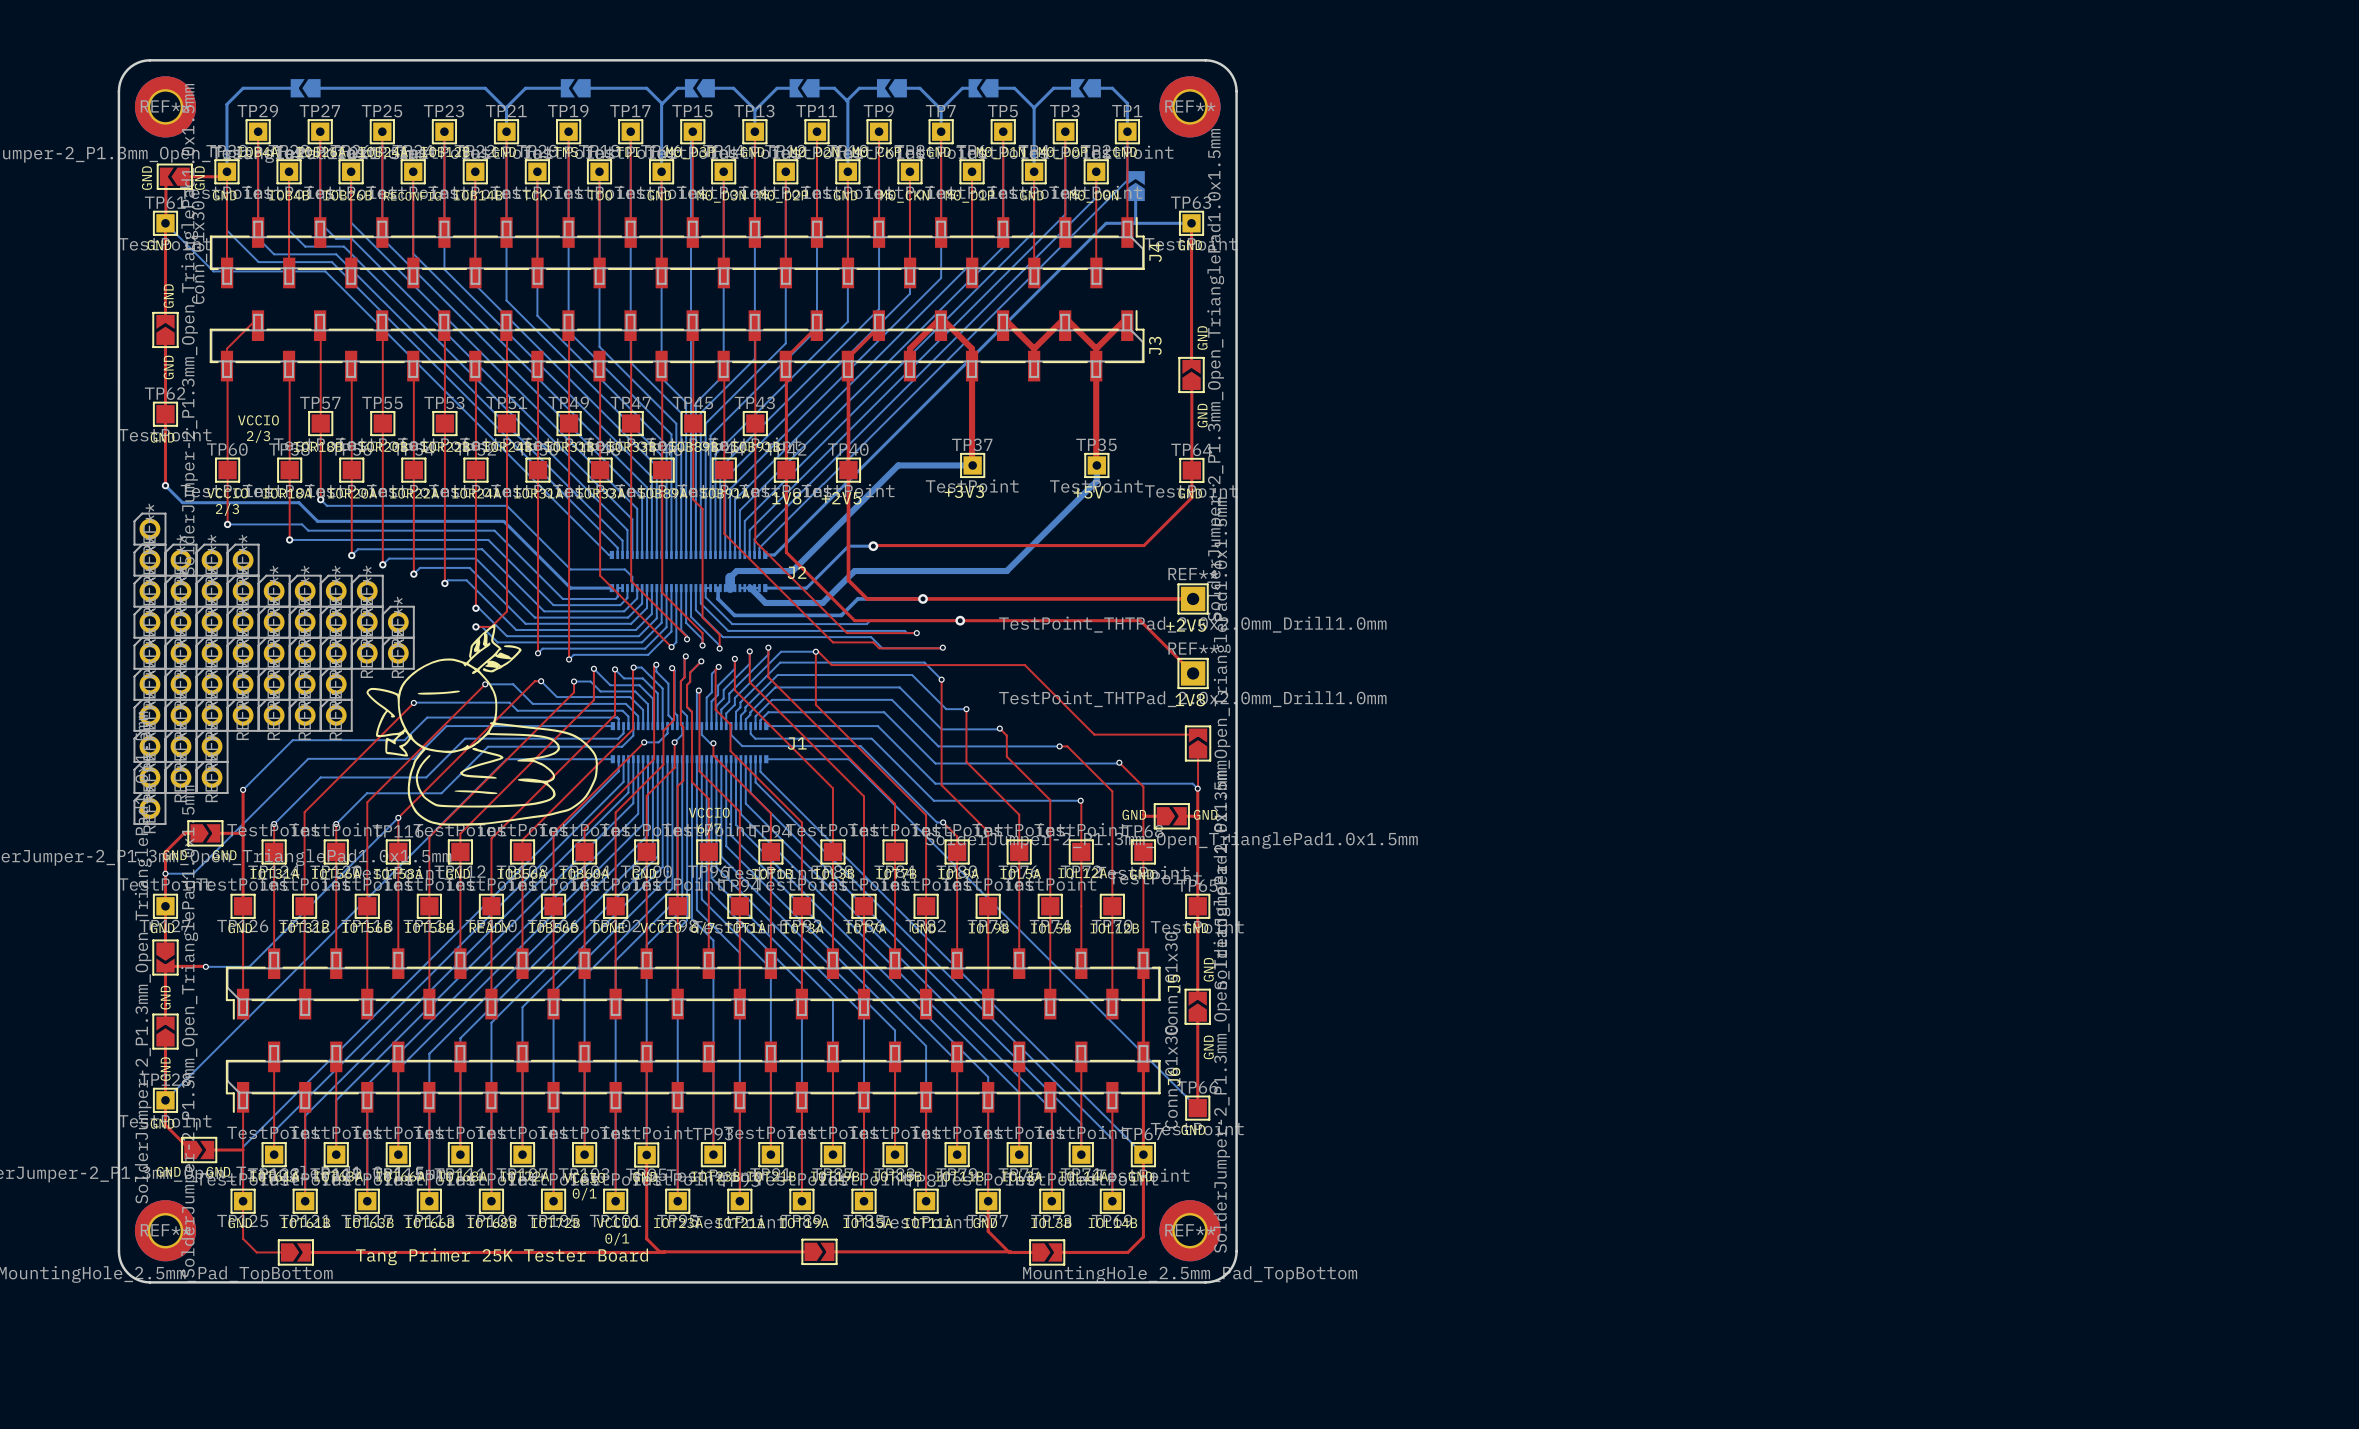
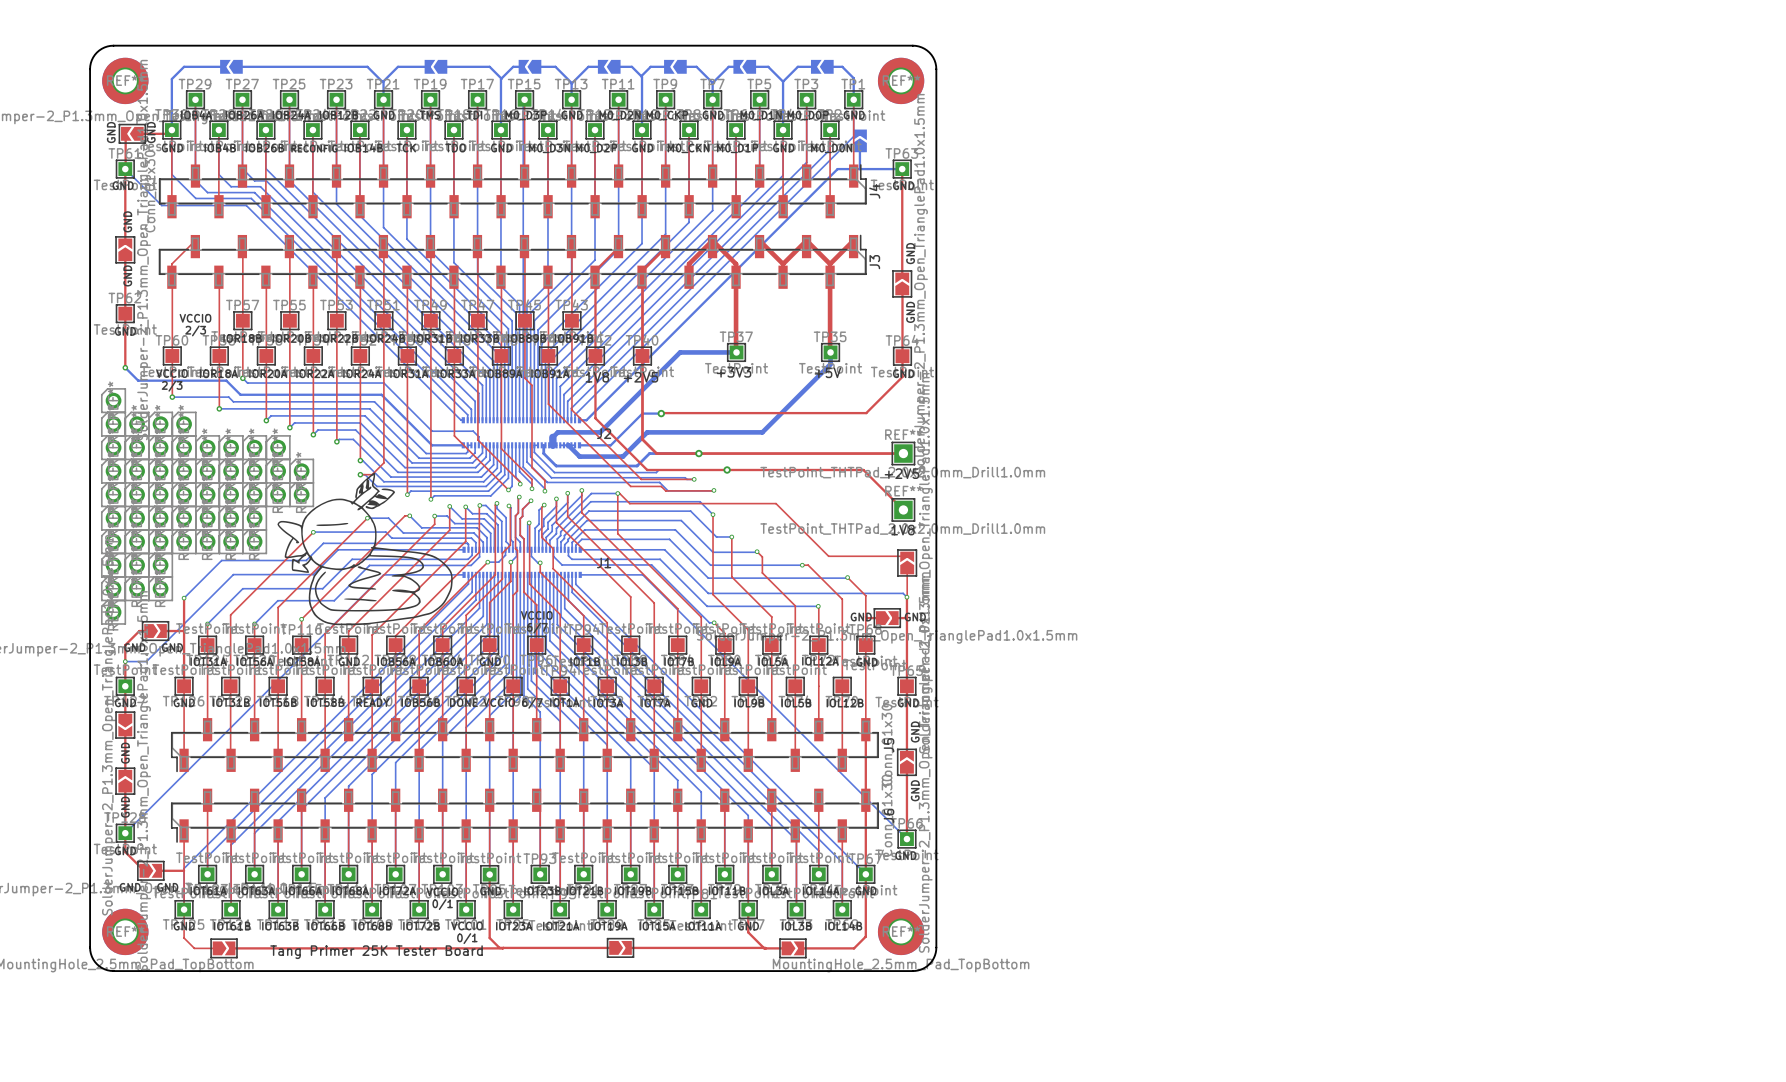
bottom track: (398, 817) (249, 966) (205, 966) -> none
top track: (165, 966) (205, 966) -> none
via: (205, 966) -> none
TP66 footprint: [1185, 1095, 1211, 1121] -> [897, 829, 917, 849]

